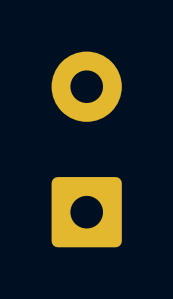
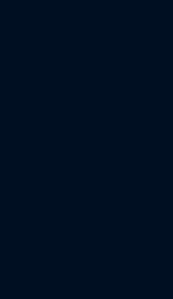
part: (86, 149) -> none

